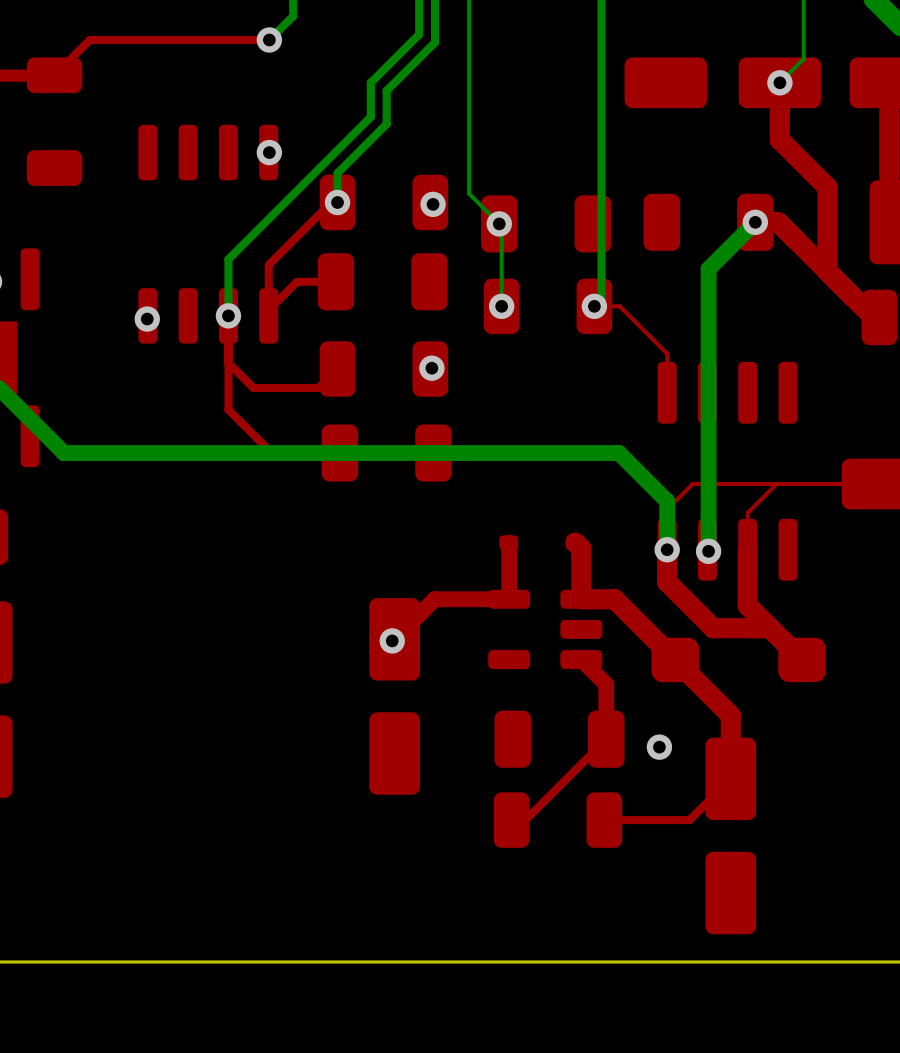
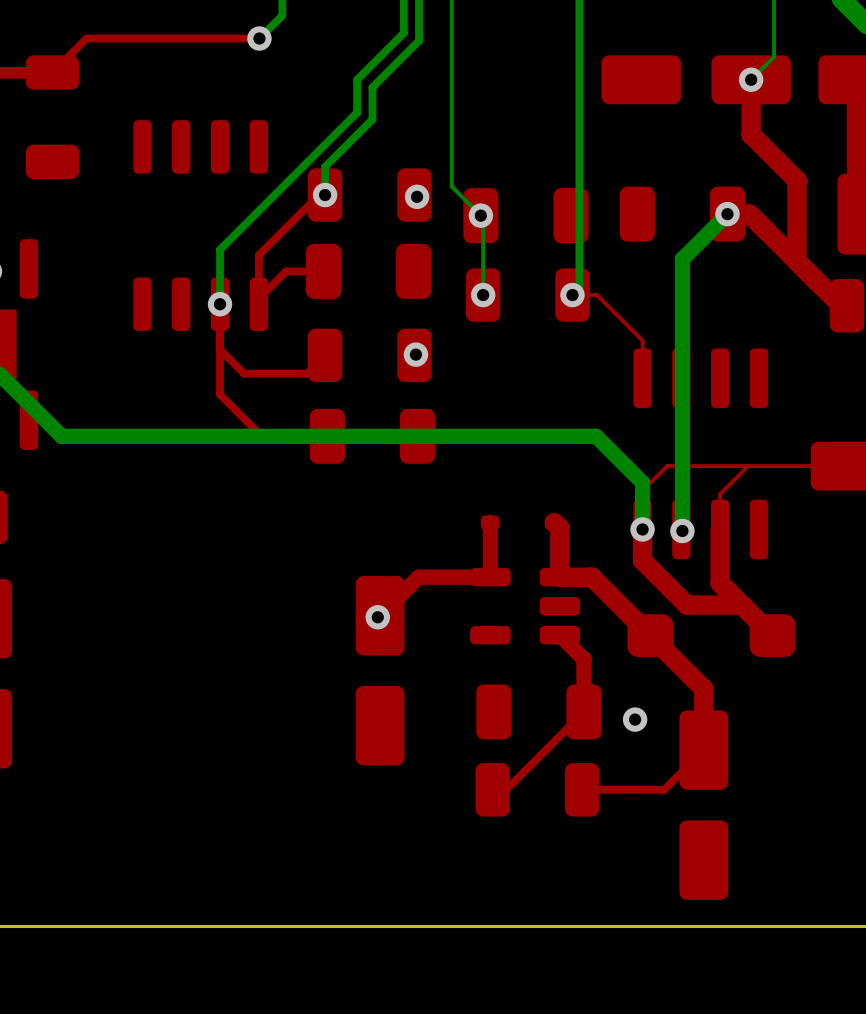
via: (269, 152) -> none
via: (147, 319) -> none

